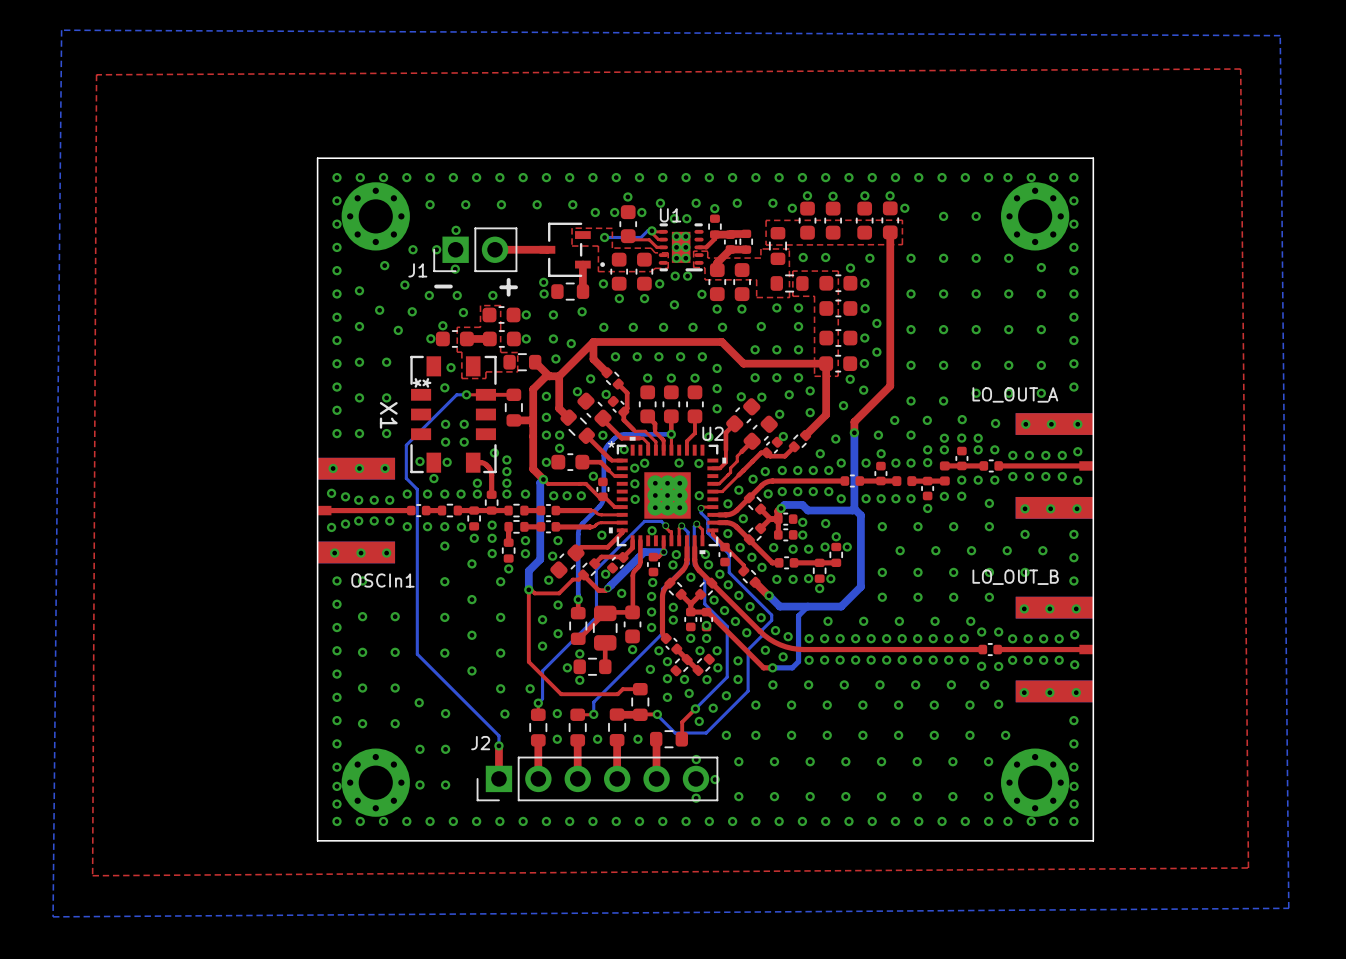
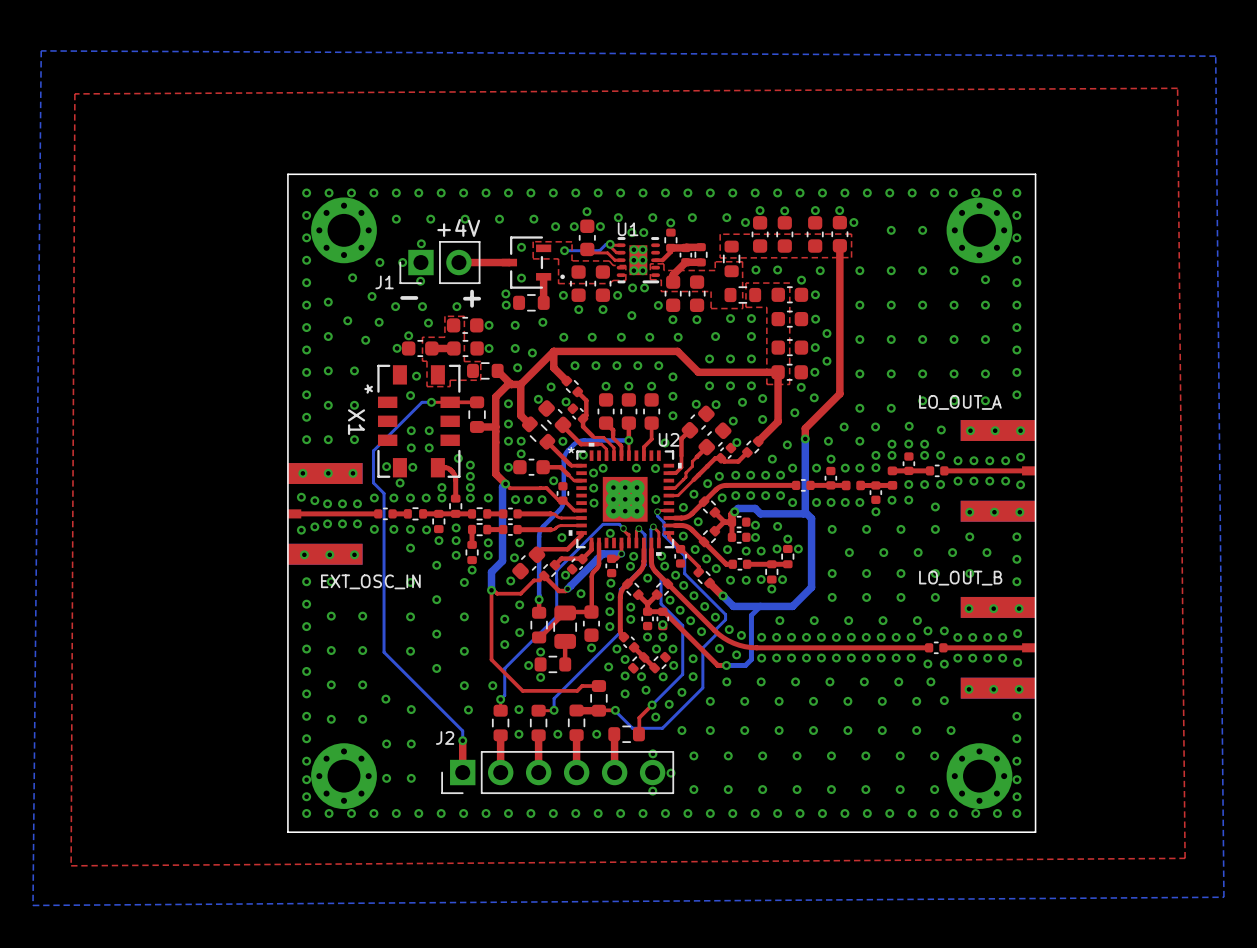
text: none -> +4V (458, 227)
via: none -> (521, 247)
via: none -> (521, 278)
X1 footprint: [410, 355, 497, 474] -> [377, 364, 461, 478]
OSCIn1 name: OSCIn1 (382, 580) -> EXT_OSC_IN (370, 581)

